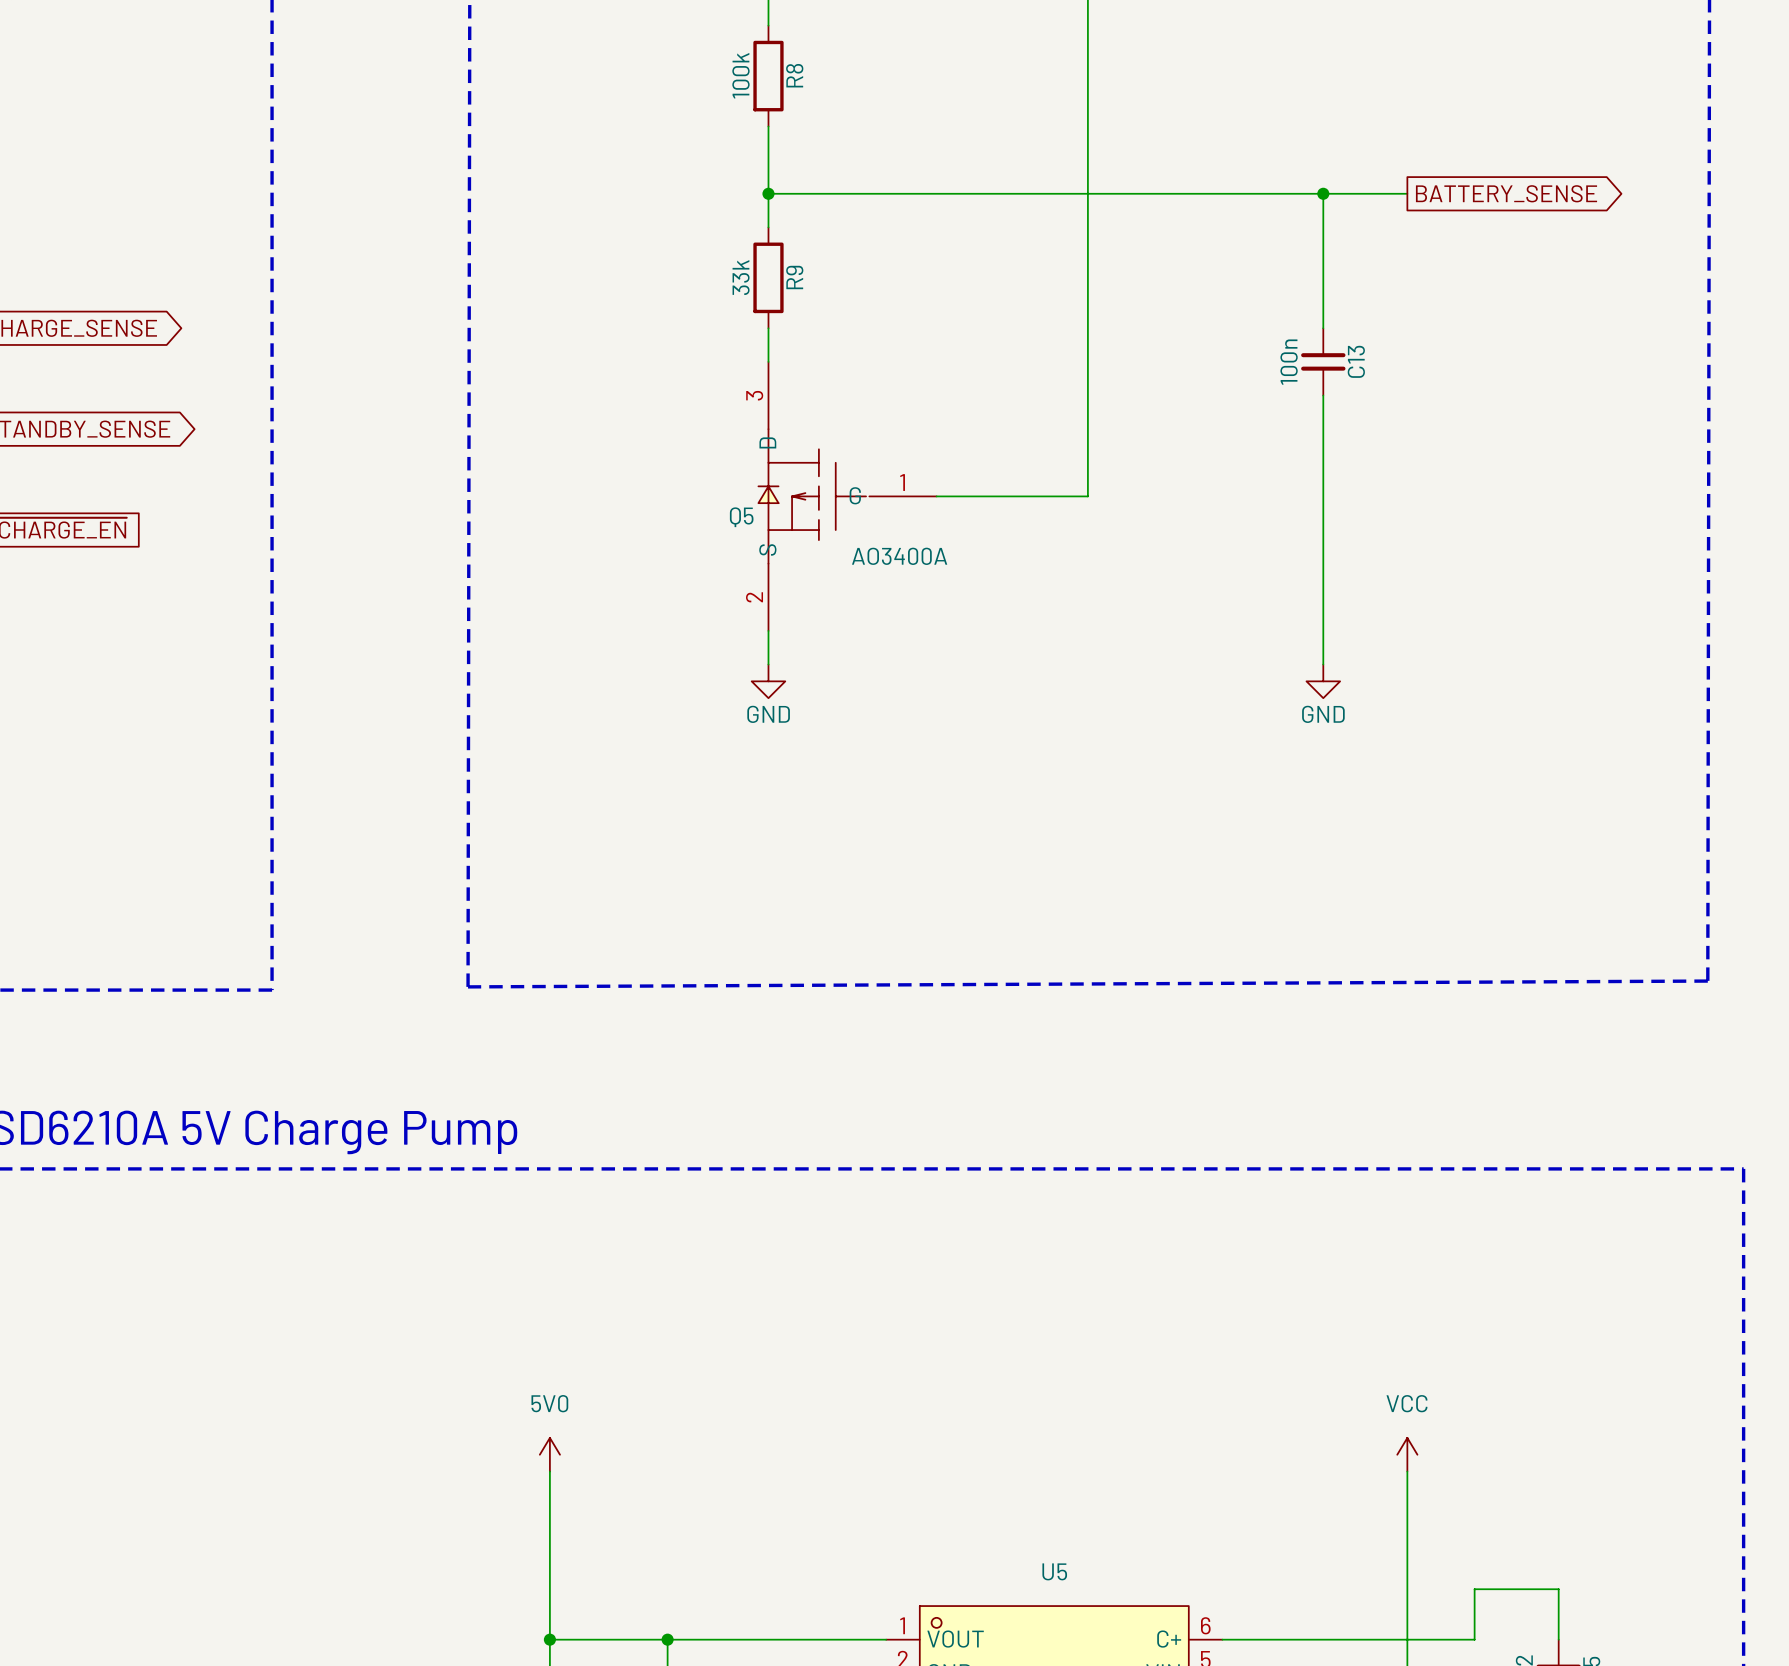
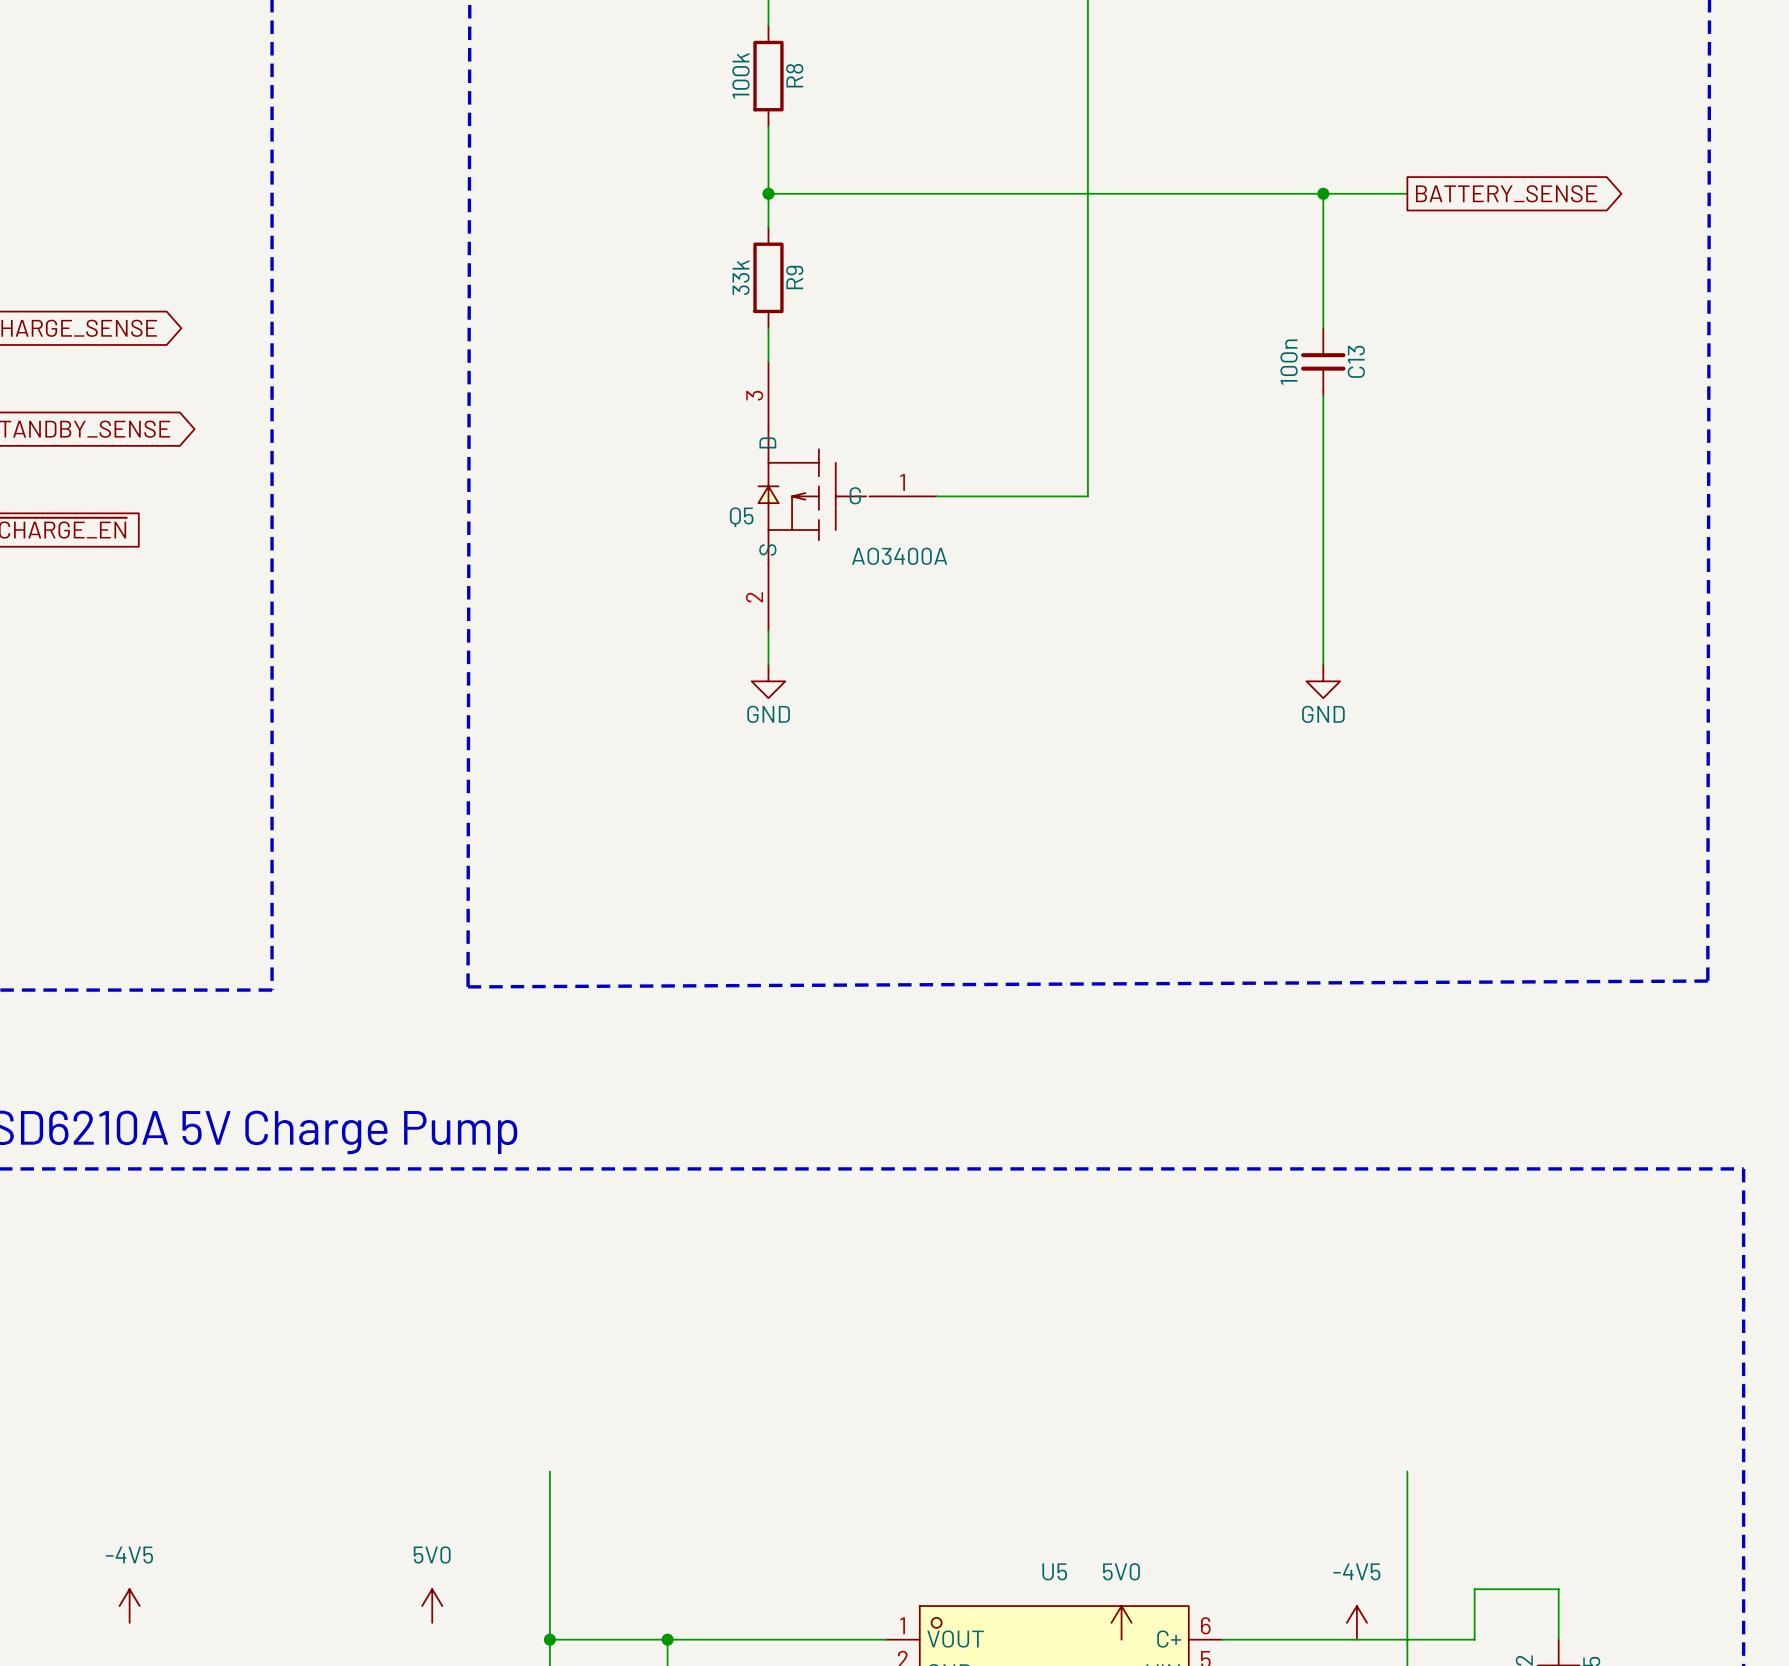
power symbol position: 5V0 (549, 1454) -> 5V0 (432, 1606)
power symbol: VCC (1407, 1454) -> none
power symbol: none -> -4V5 (129, 1606)
power symbol: none -> 5V0 (1121, 1622)
power symbol: none -> -4V5 (1356, 1622)

